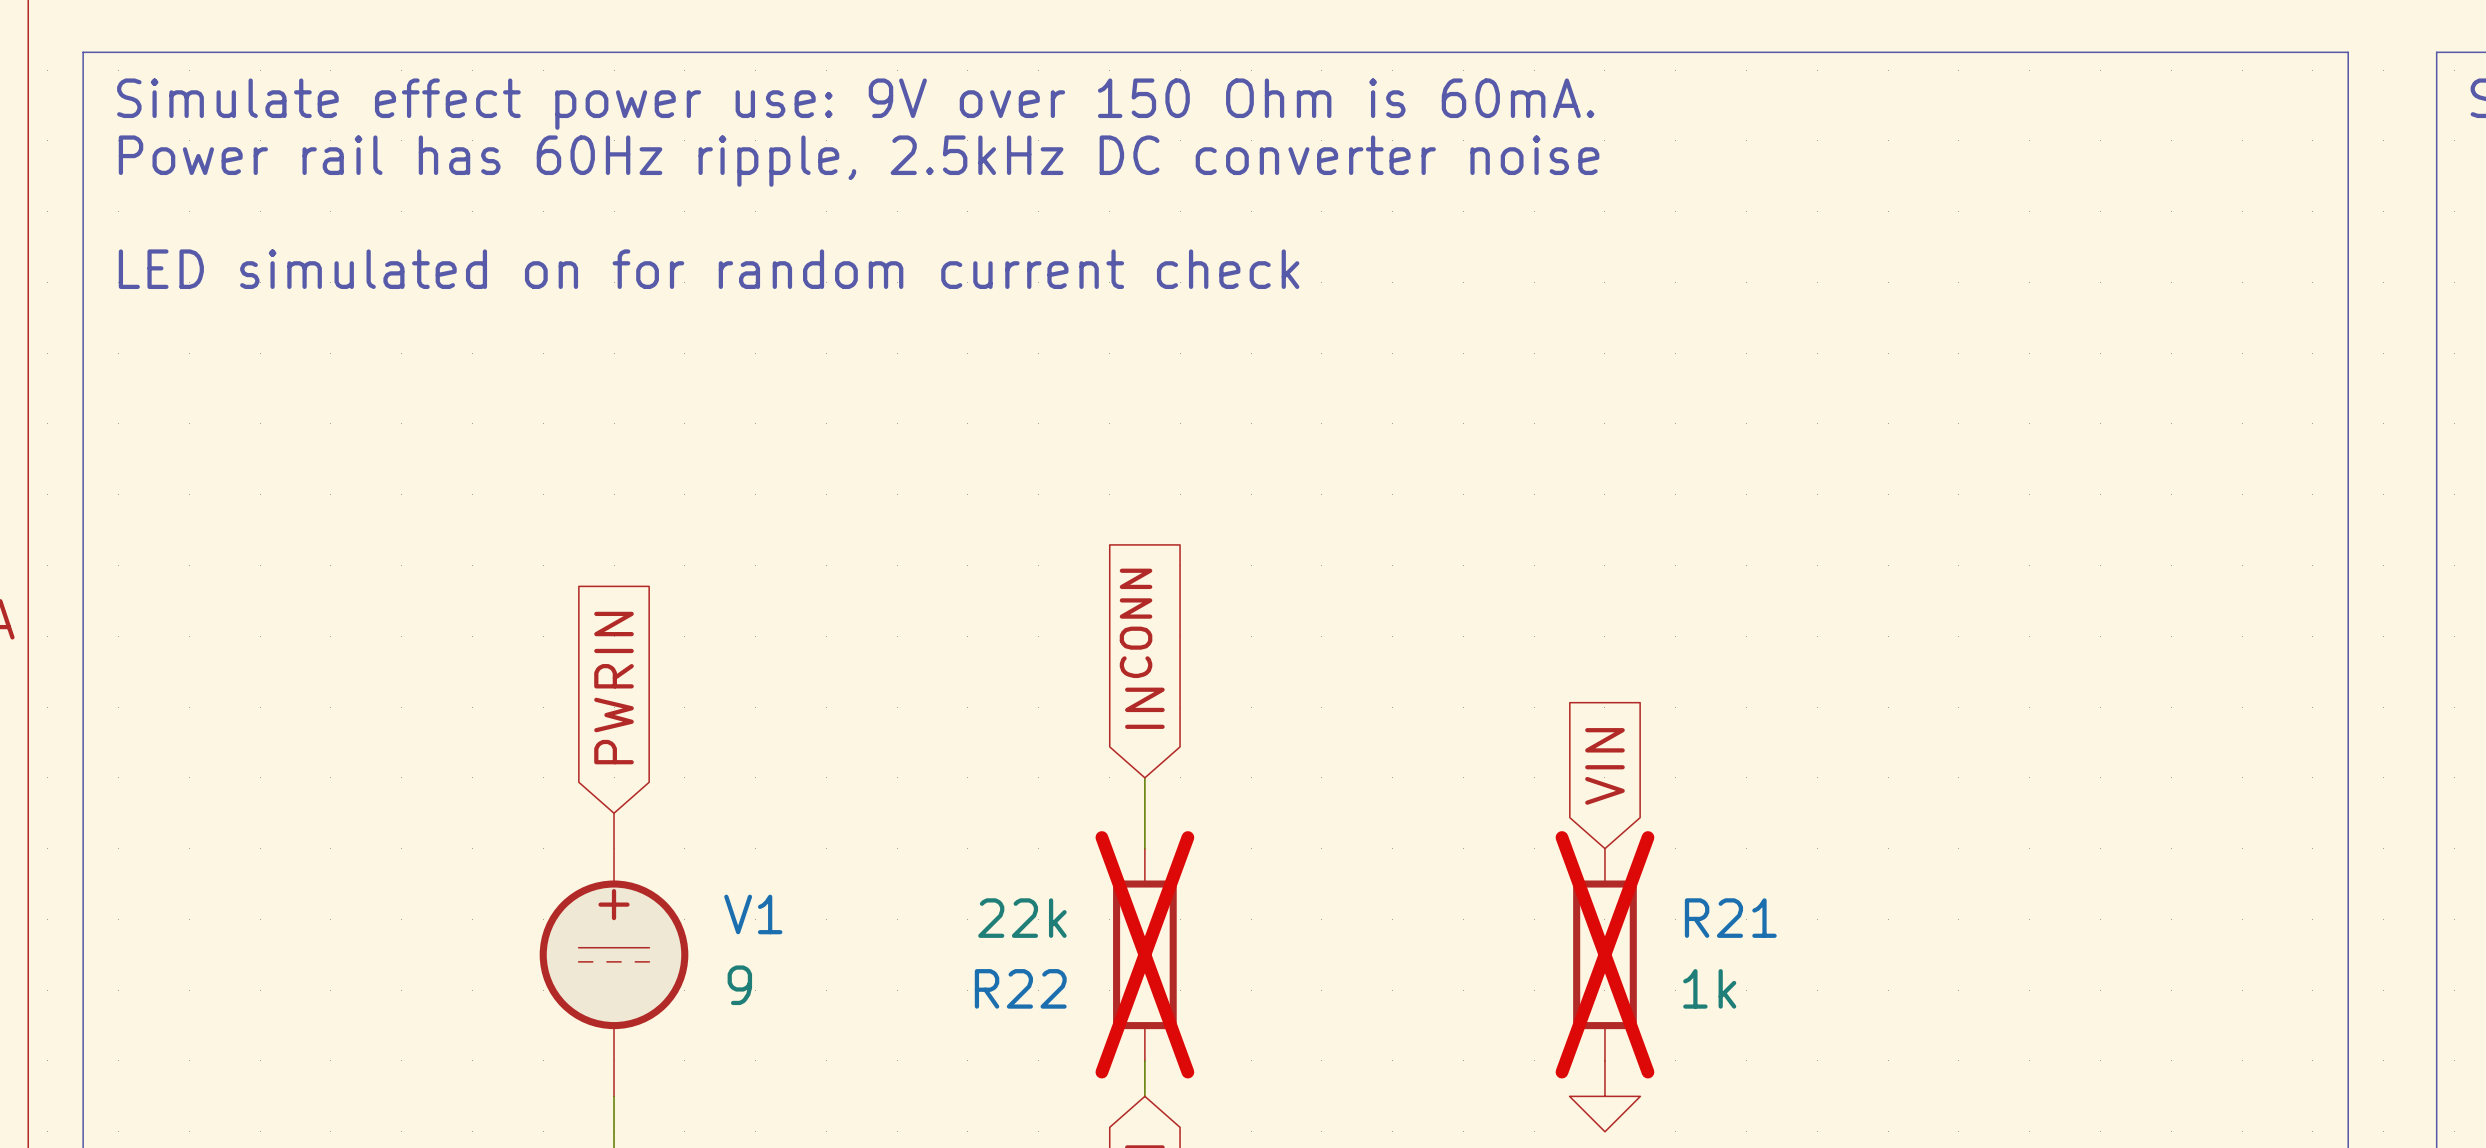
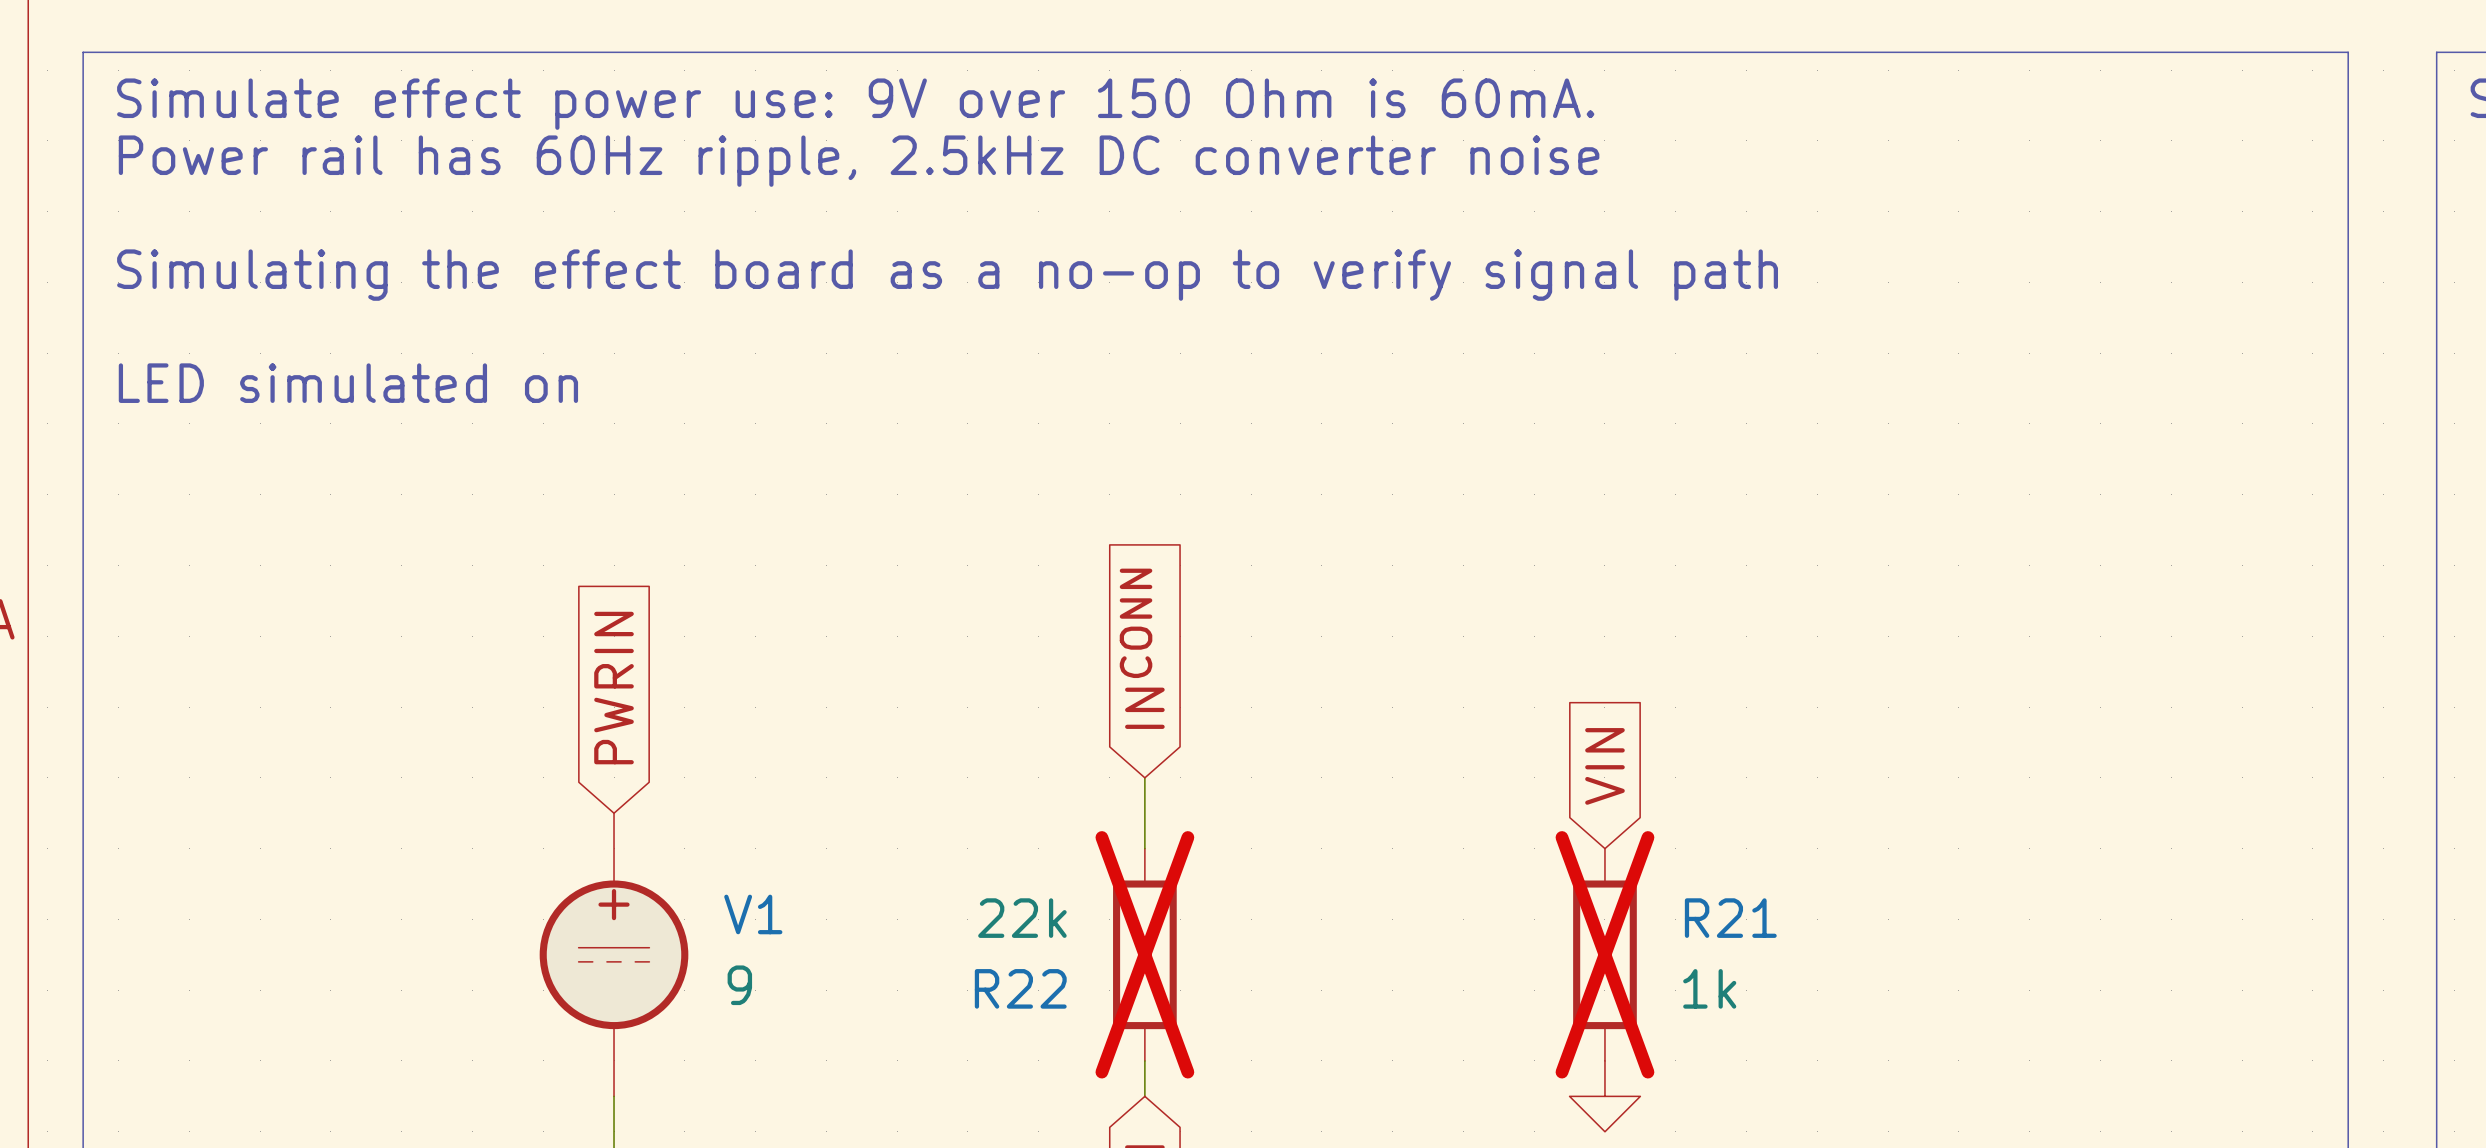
text: LED simulated on for random current check (709, 269) -> Simulating the effect board as a no-op to verify signal path (947, 275)
text: none -> LED simulated on (348, 383)

